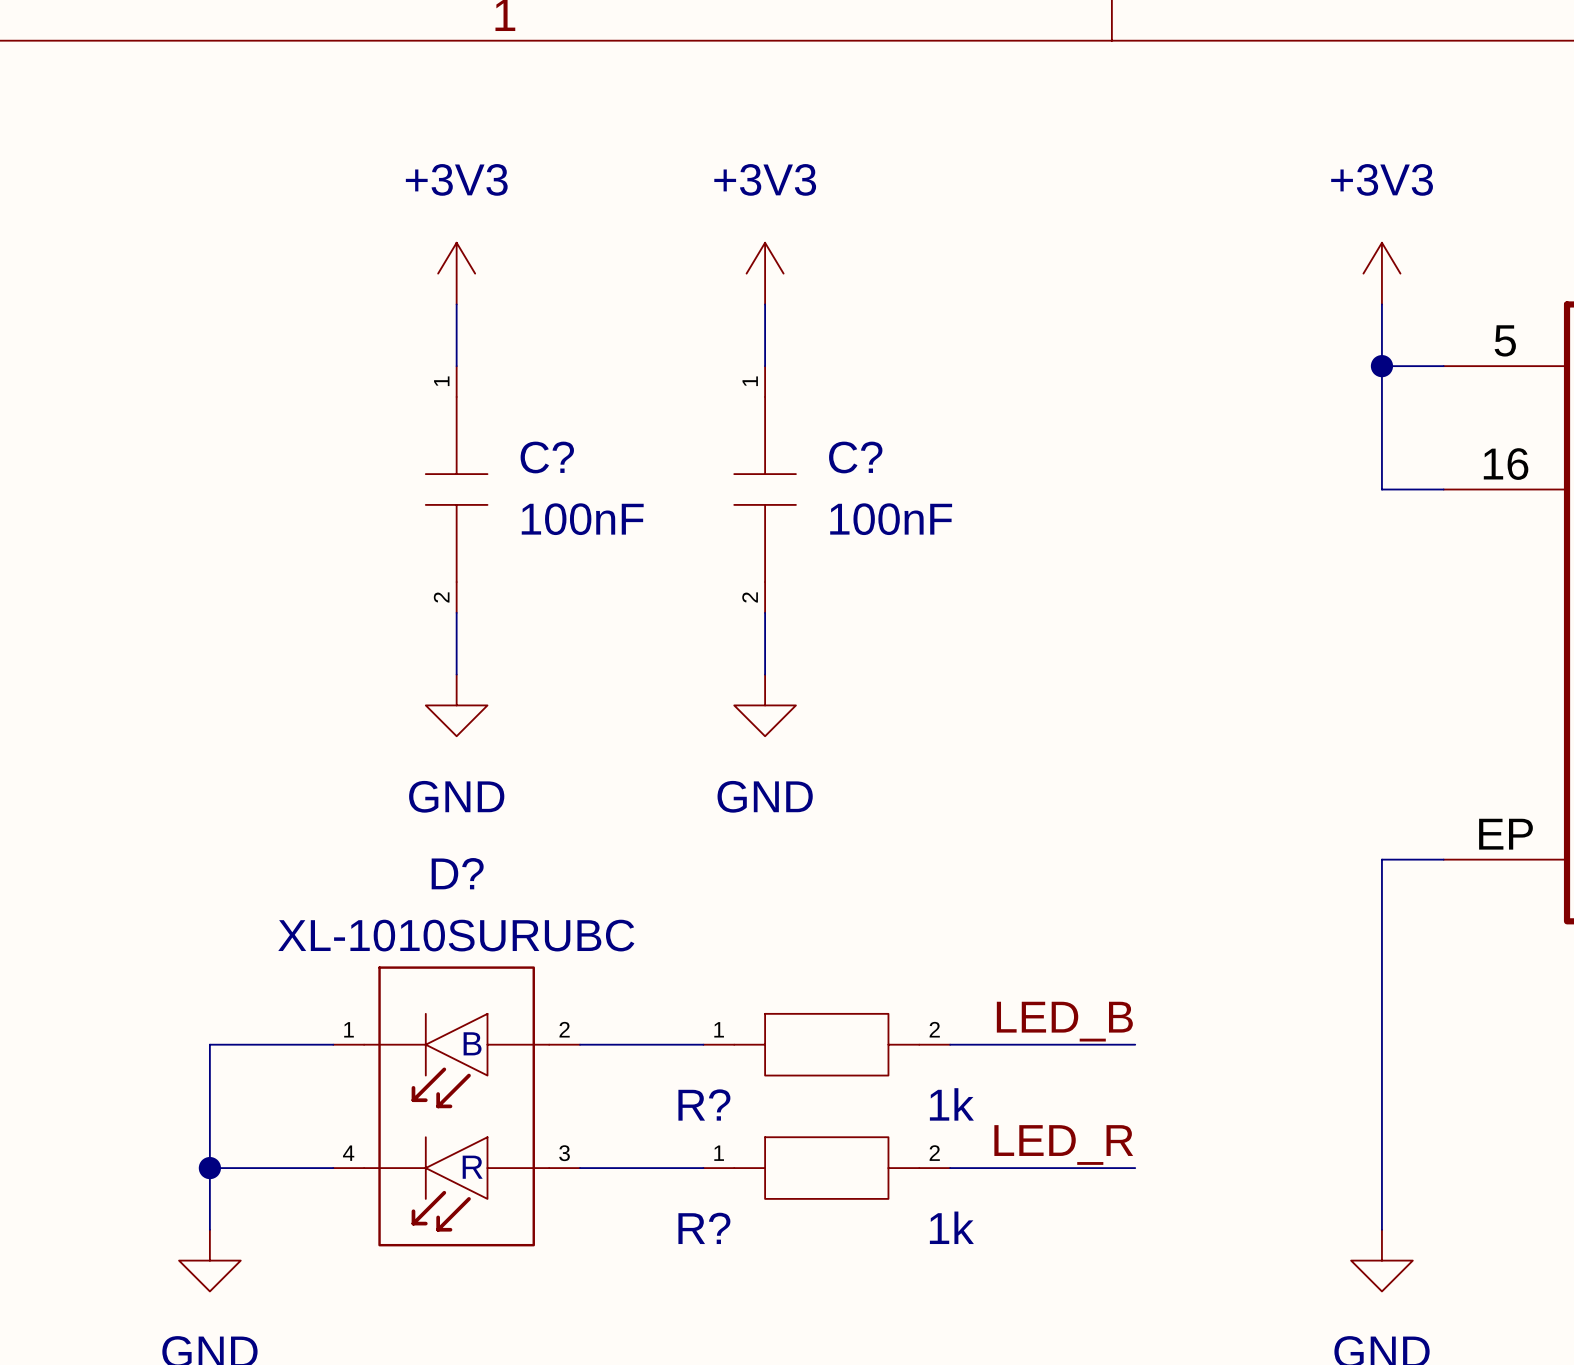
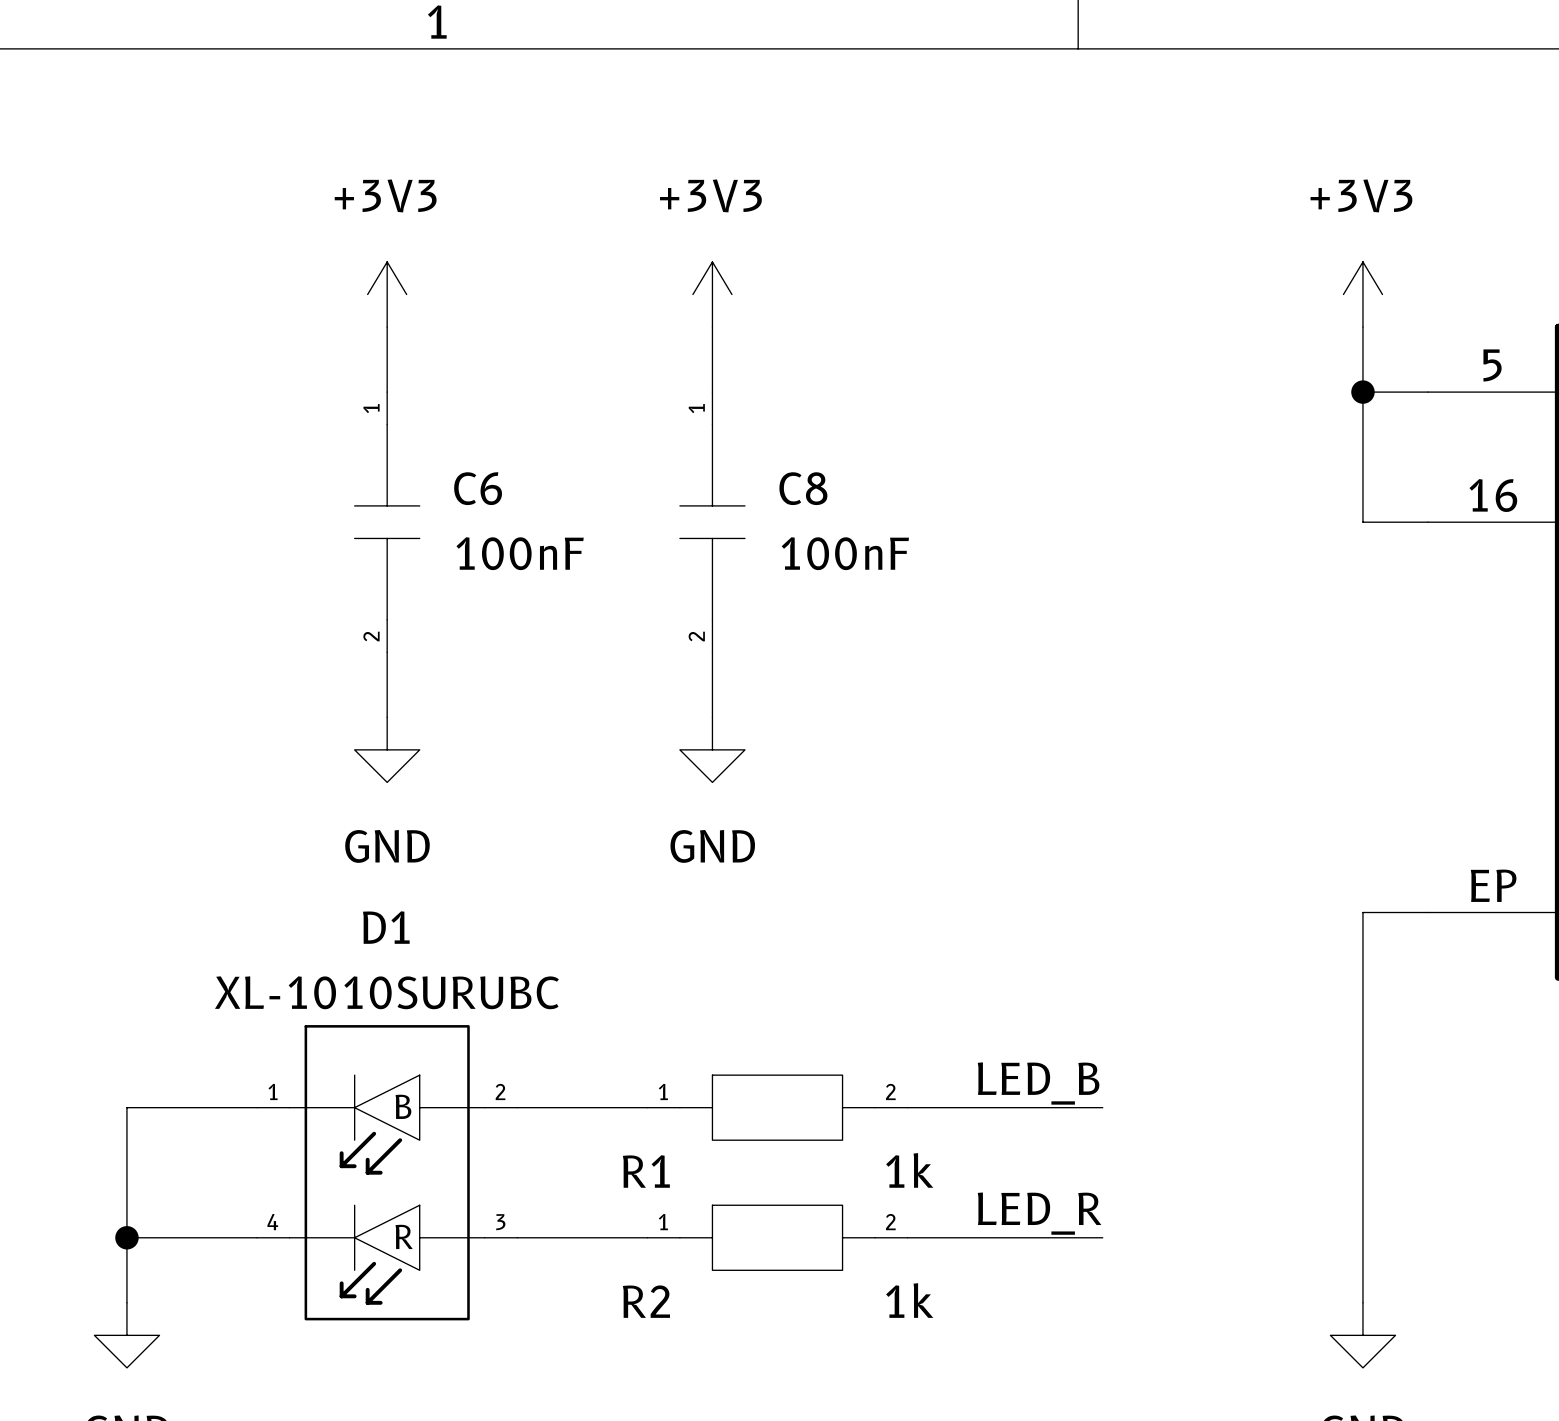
C? name: C? (547, 457) -> C6 (478, 488)
C? name: C? (855, 457) -> C8 (803, 488)
D? name: D? (457, 873) -> D1 (386, 927)
R? name: R? (704, 1105) -> R1 (646, 1171)
R? name: R? (704, 1228) -> R2 (646, 1301)

